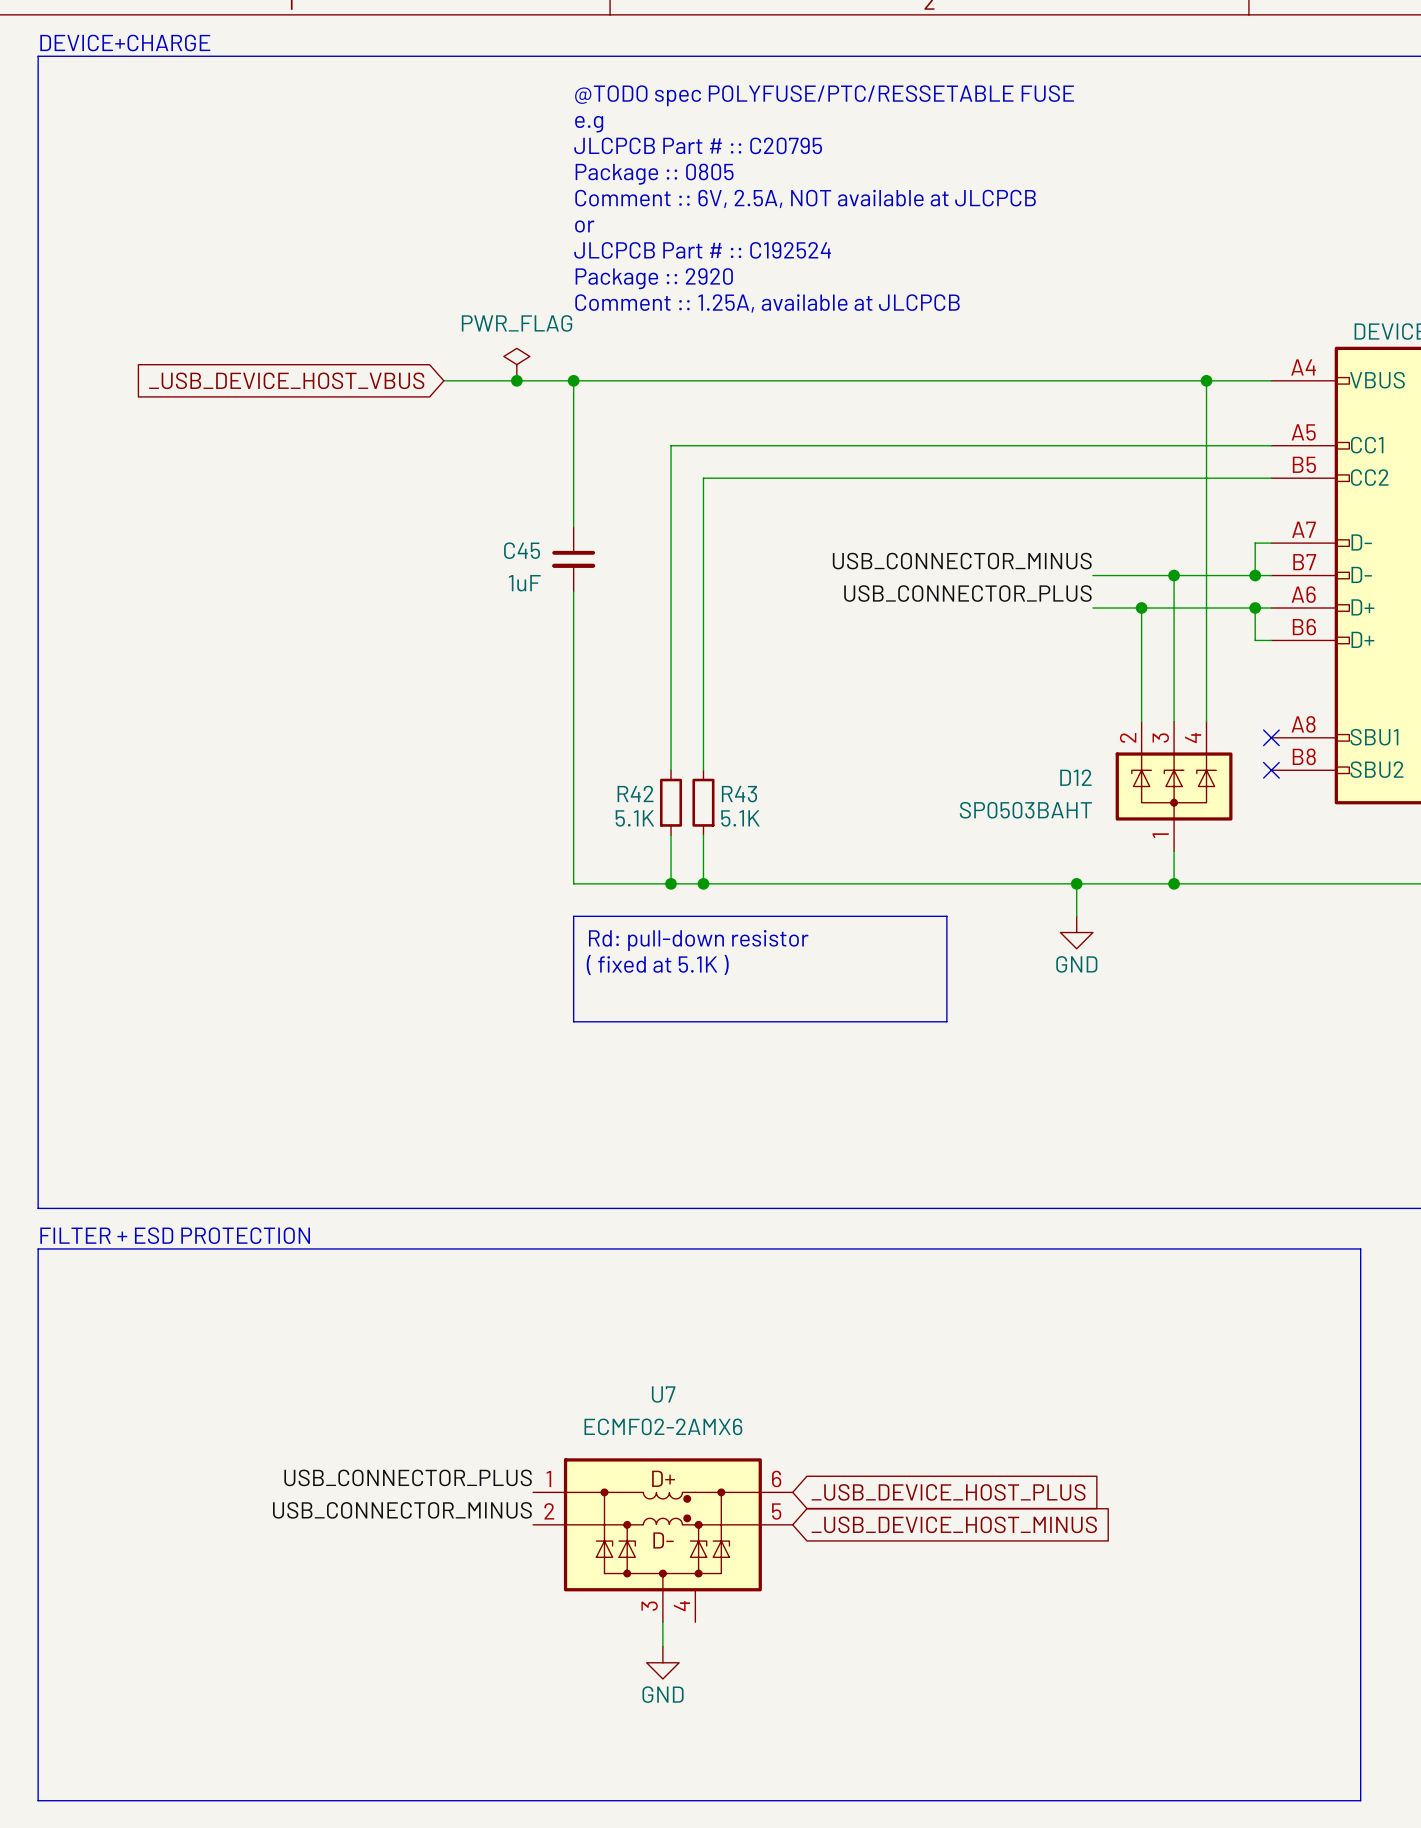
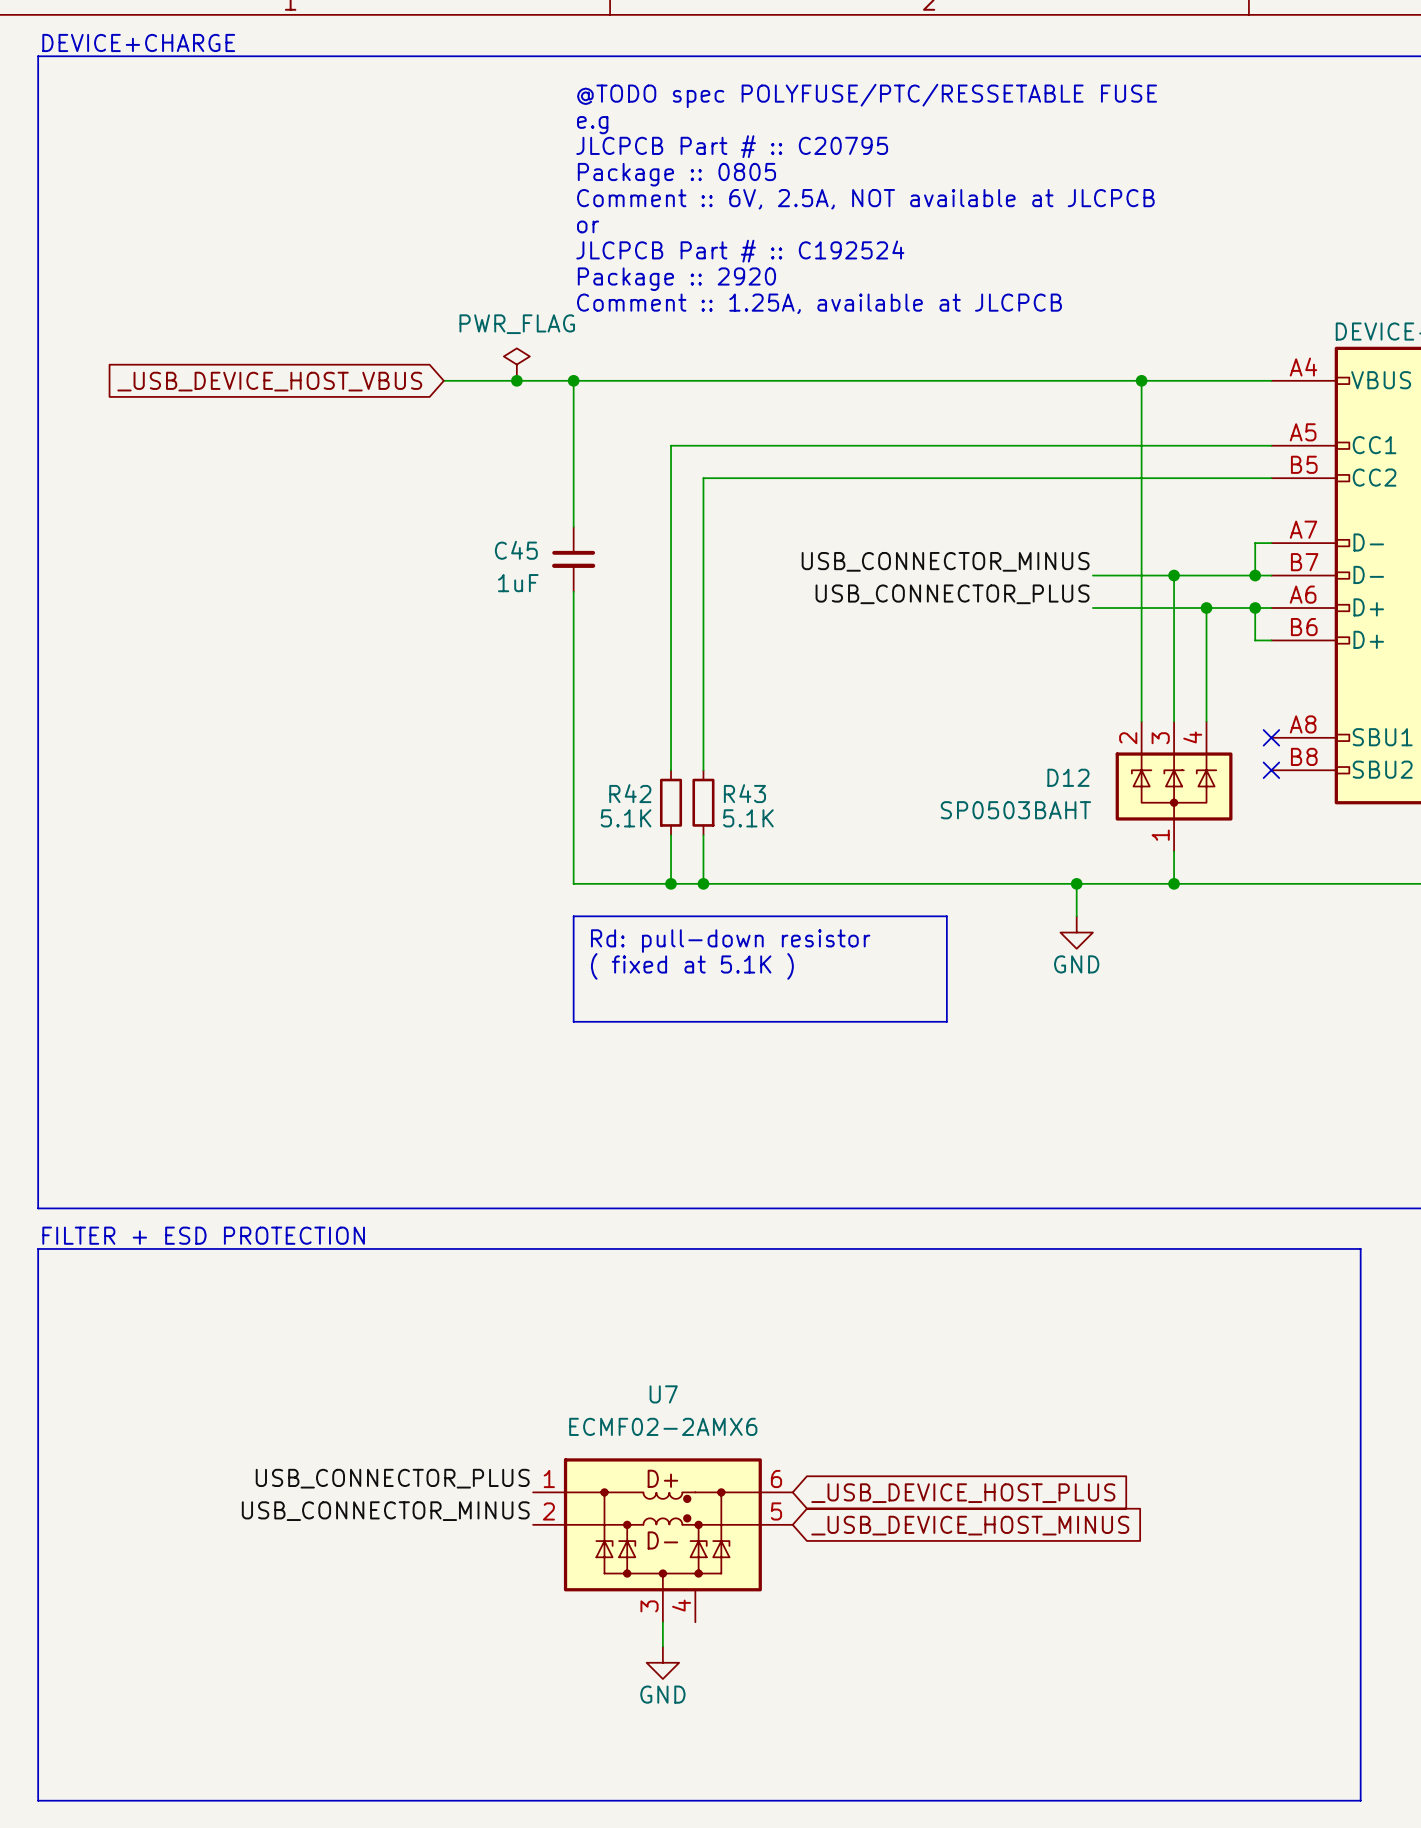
wire: (1206, 380) (1206, 608) -> (1141, 380) (1141, 608)
junction position: (1206, 380) -> (1141, 380)
junction position: (1141, 608) -> (1206, 608)

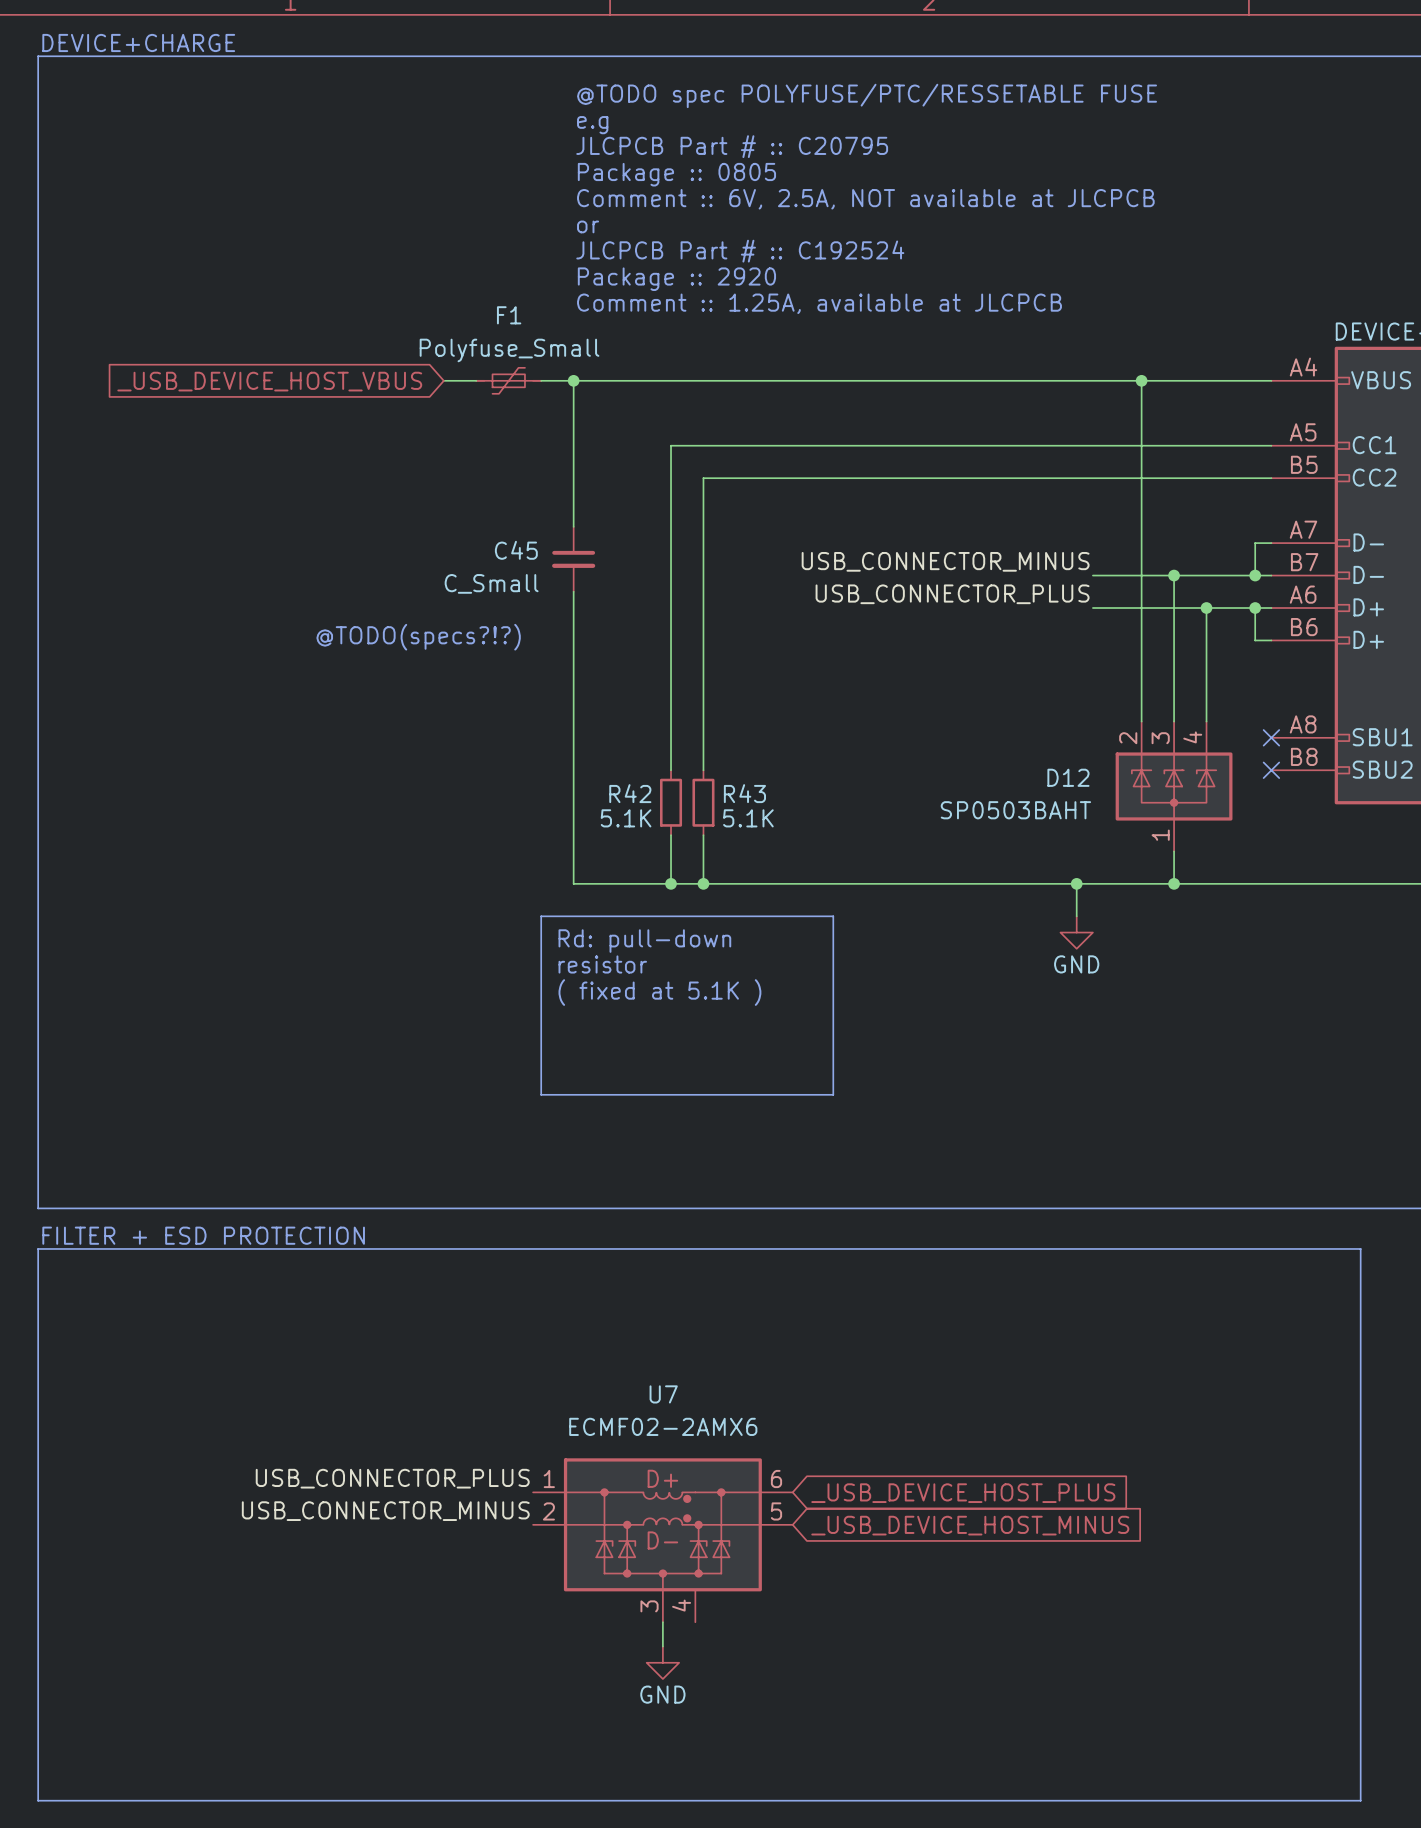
power symbol: PWR_FLAG (516, 364) -> none
F1: none -> Polyfuse_Small (508, 380)
junction: (516, 380) -> none
C45 value: 1uF (518, 583) -> C_Small (491, 583)
text: none -> @TODO(specs?!?) (418, 637)
line: (573, 916) (573, 1021) (946, 1021) (946, 916) (833, 916) -> (573, 916) (541, 916) (541, 1094) (833, 1094) (833, 916)
text: Rd: pull-down resistor (730, 941) -> Rd: pull-down (644, 941)
text: none -> resistor (602, 964)
text position: ( fixed at 5.1K ) (692, 966) -> ( fixed at 5.1K ) (659, 992)

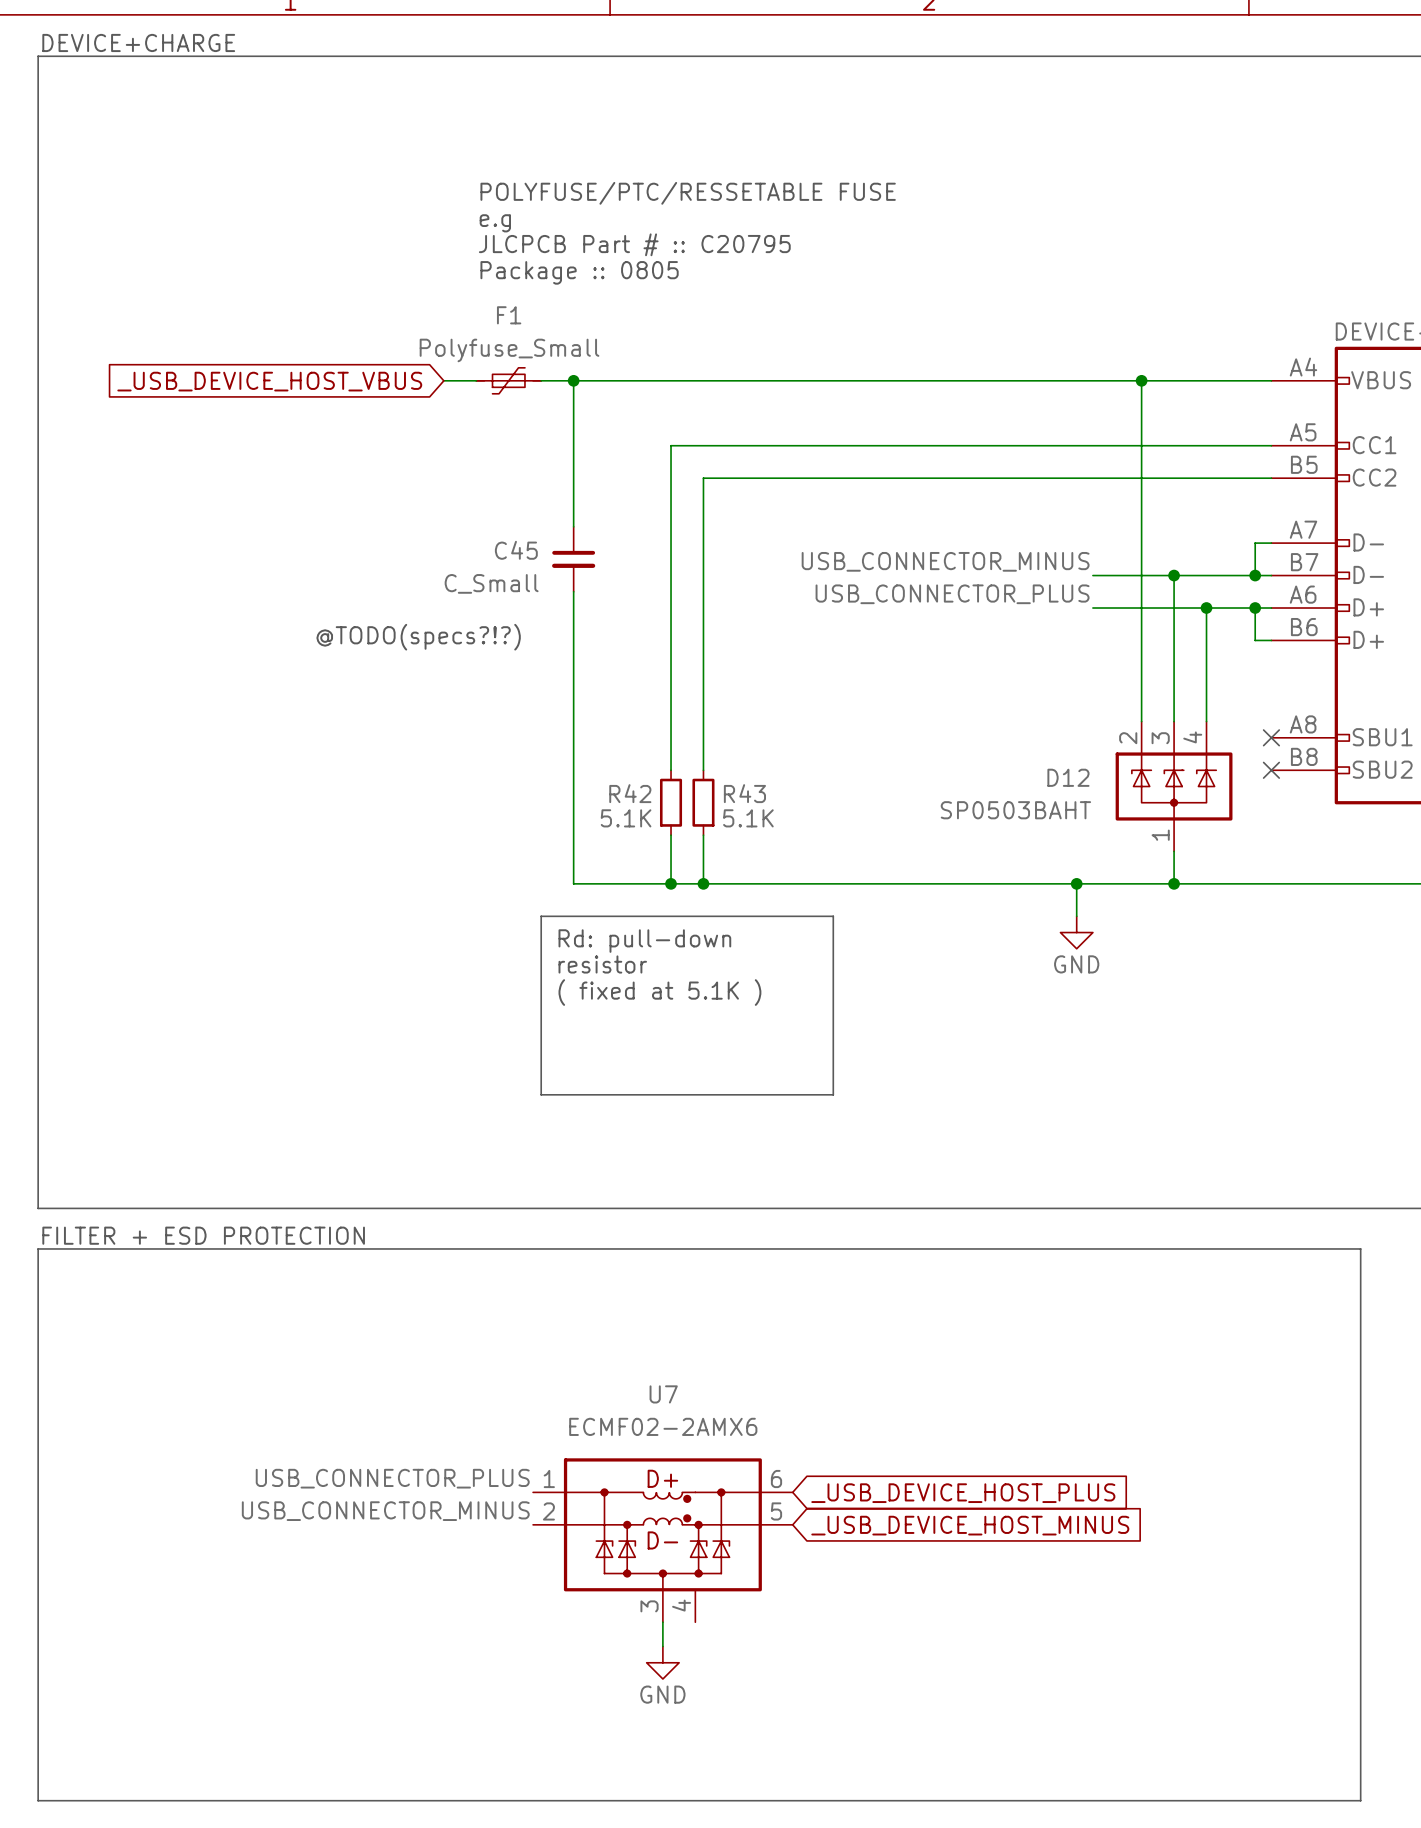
text: @TODO spec POLYFUSE/PTC/RESSETABLE FUSE (867, 95) -> none
text position: e.g (592, 125) -> e.g (495, 223)
text position: JLCPCB Part # :: C20795 (732, 146) -> JLCPCB Part # :: C20795 (634, 244)
text position: Package :: 0805 (676, 174) -> Package :: 0805 (579, 272)
text: none -> POLYFUSE/PTC/RESSETABLE FUSE (688, 193)
text: Comment :: 6V, 2.5A, NOT available at JLCPCB (865, 199) -> none
text: or (588, 226) -> none
text: JLCPCB Part # :: C192524 (740, 251) -> none
text: Package :: 2920 (676, 279) -> none
text: Comment :: 1.25A, available at JLCPCB (819, 303) -> none

